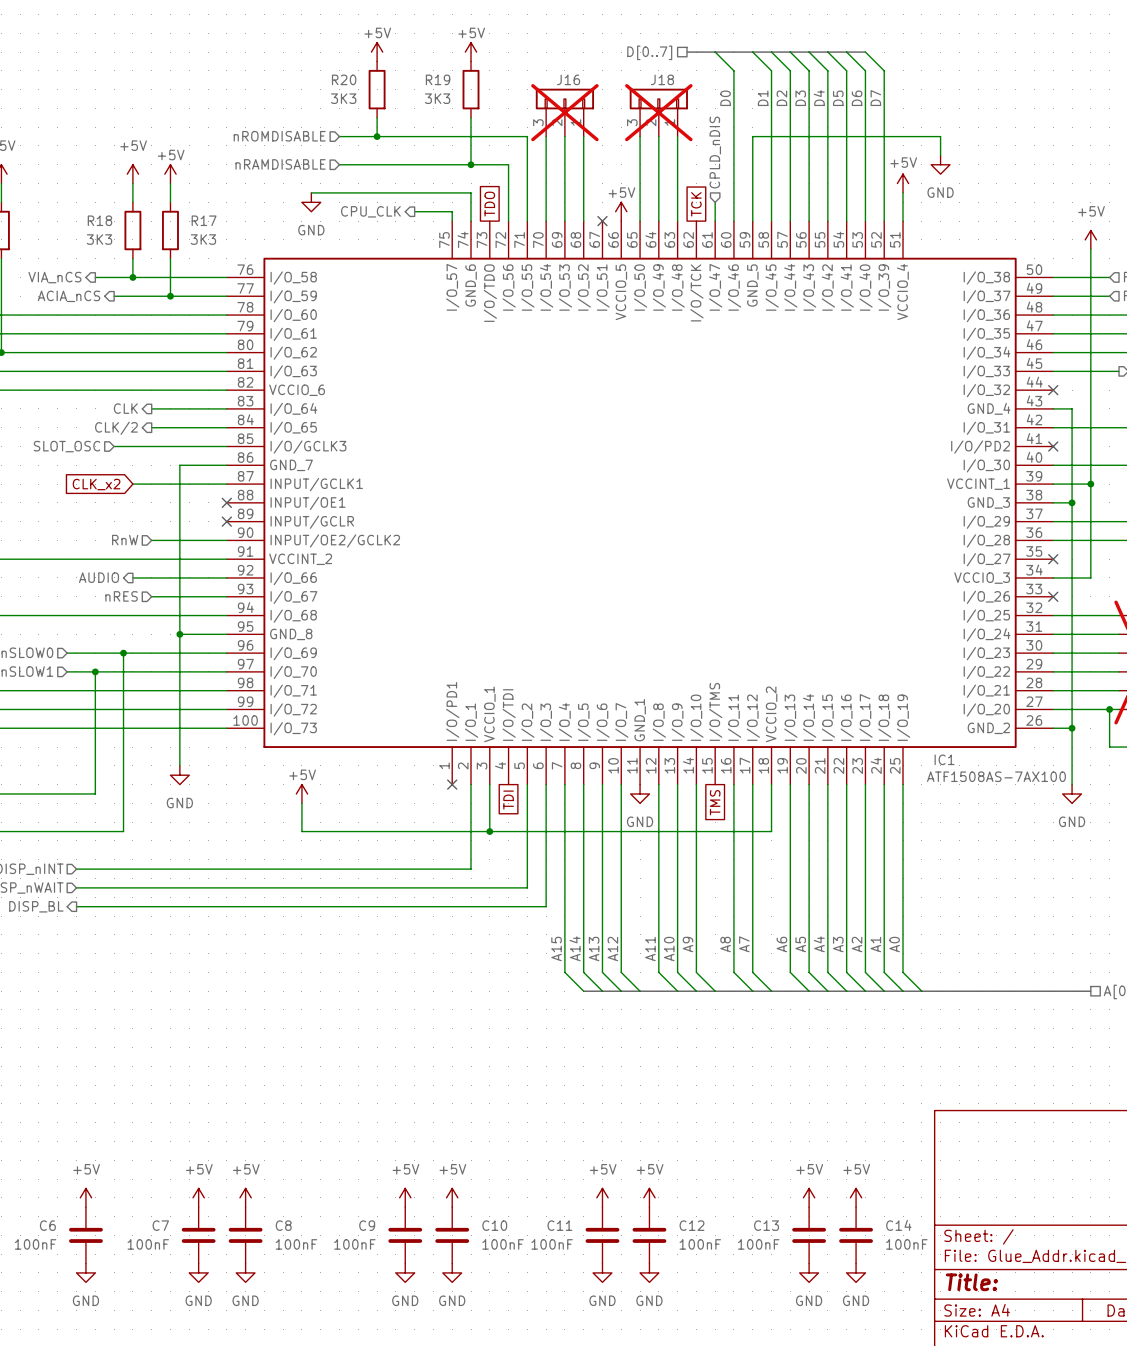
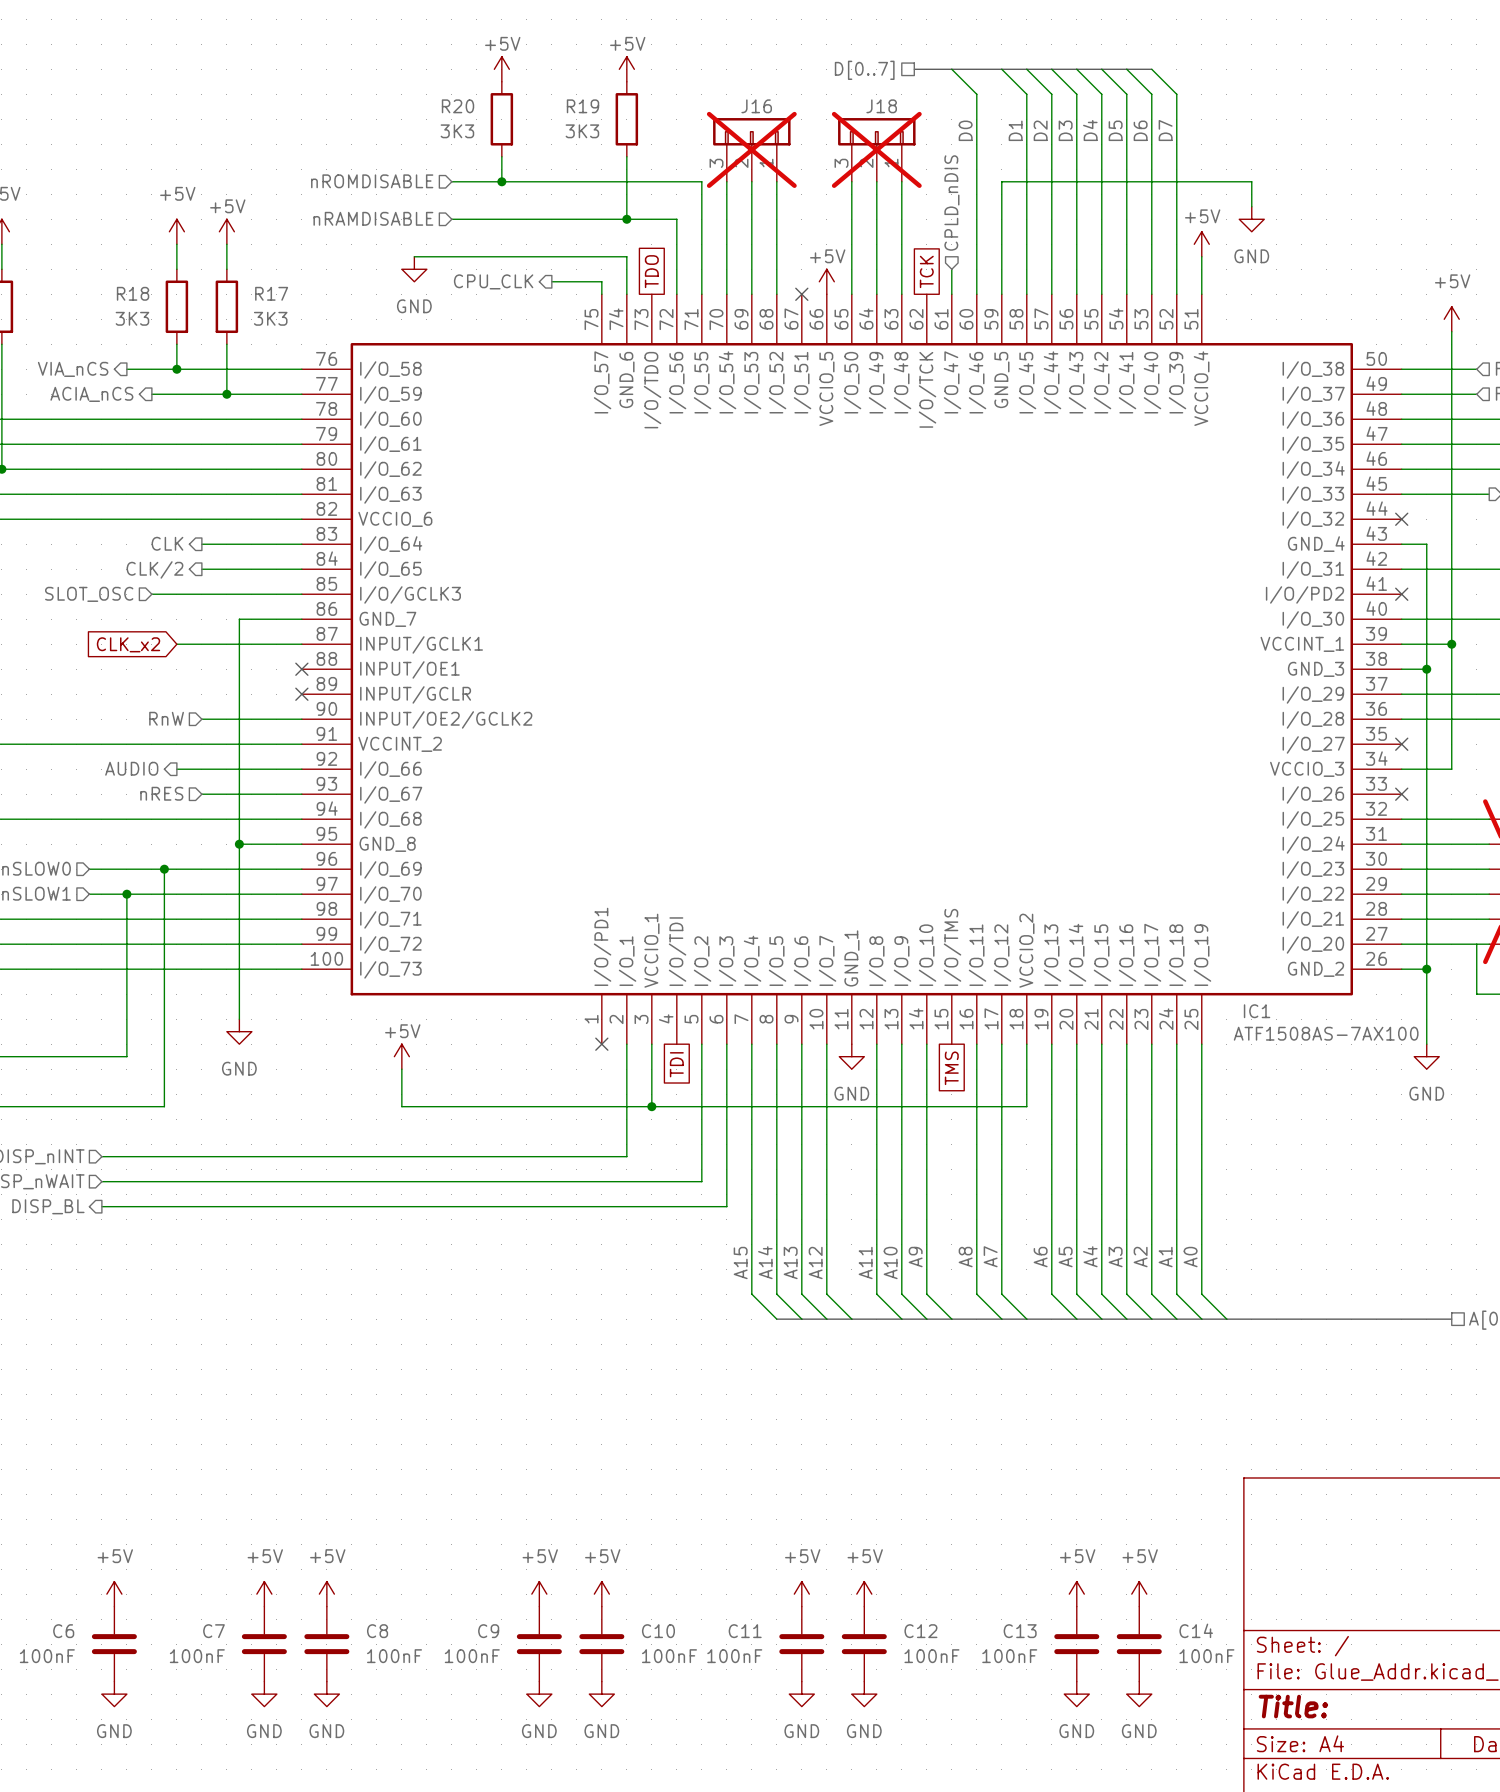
junction: (1109, 709) -> none

